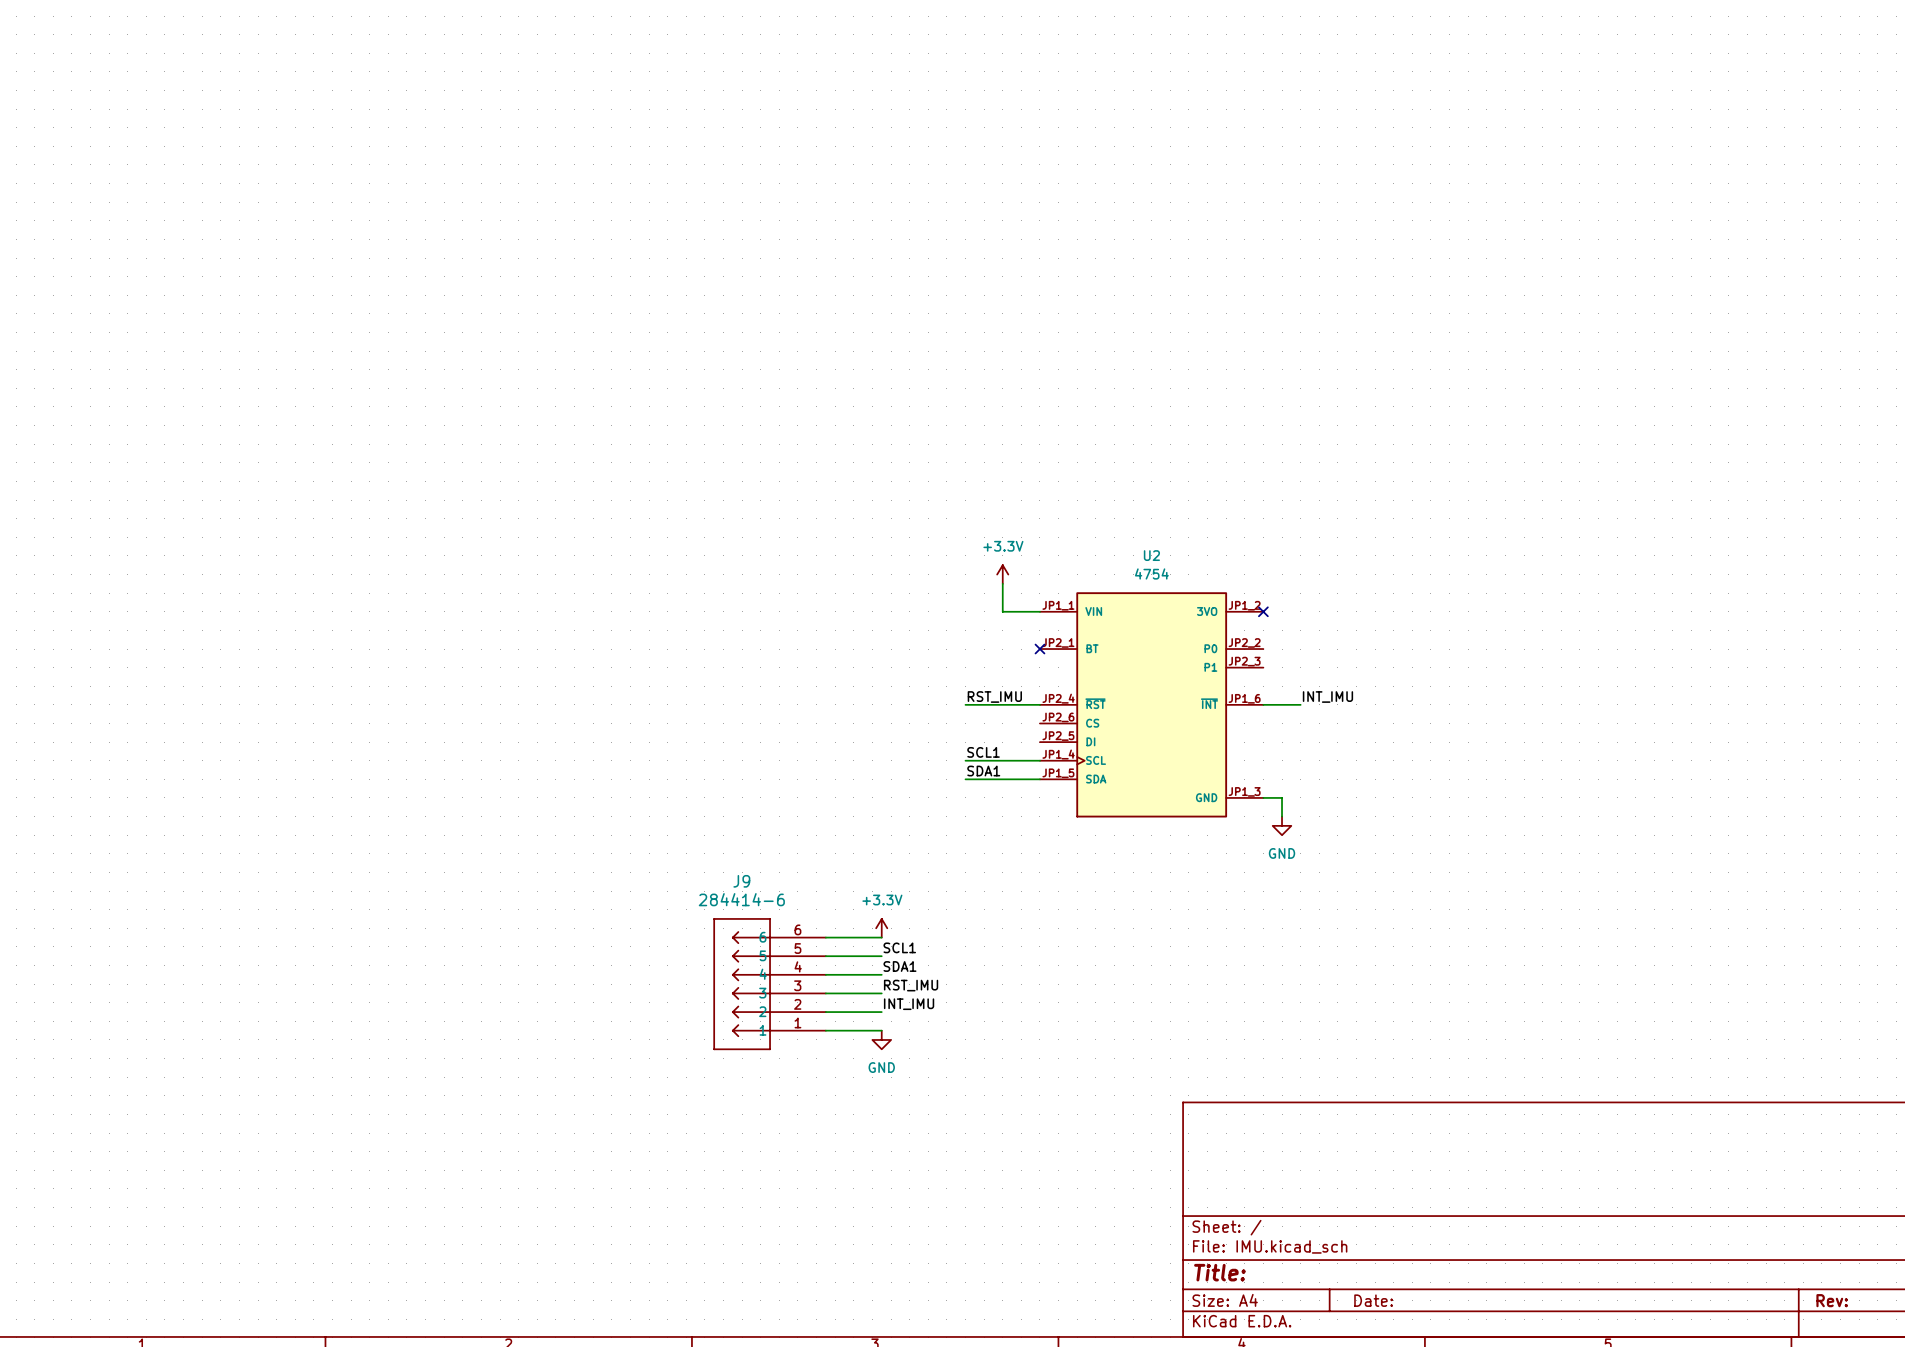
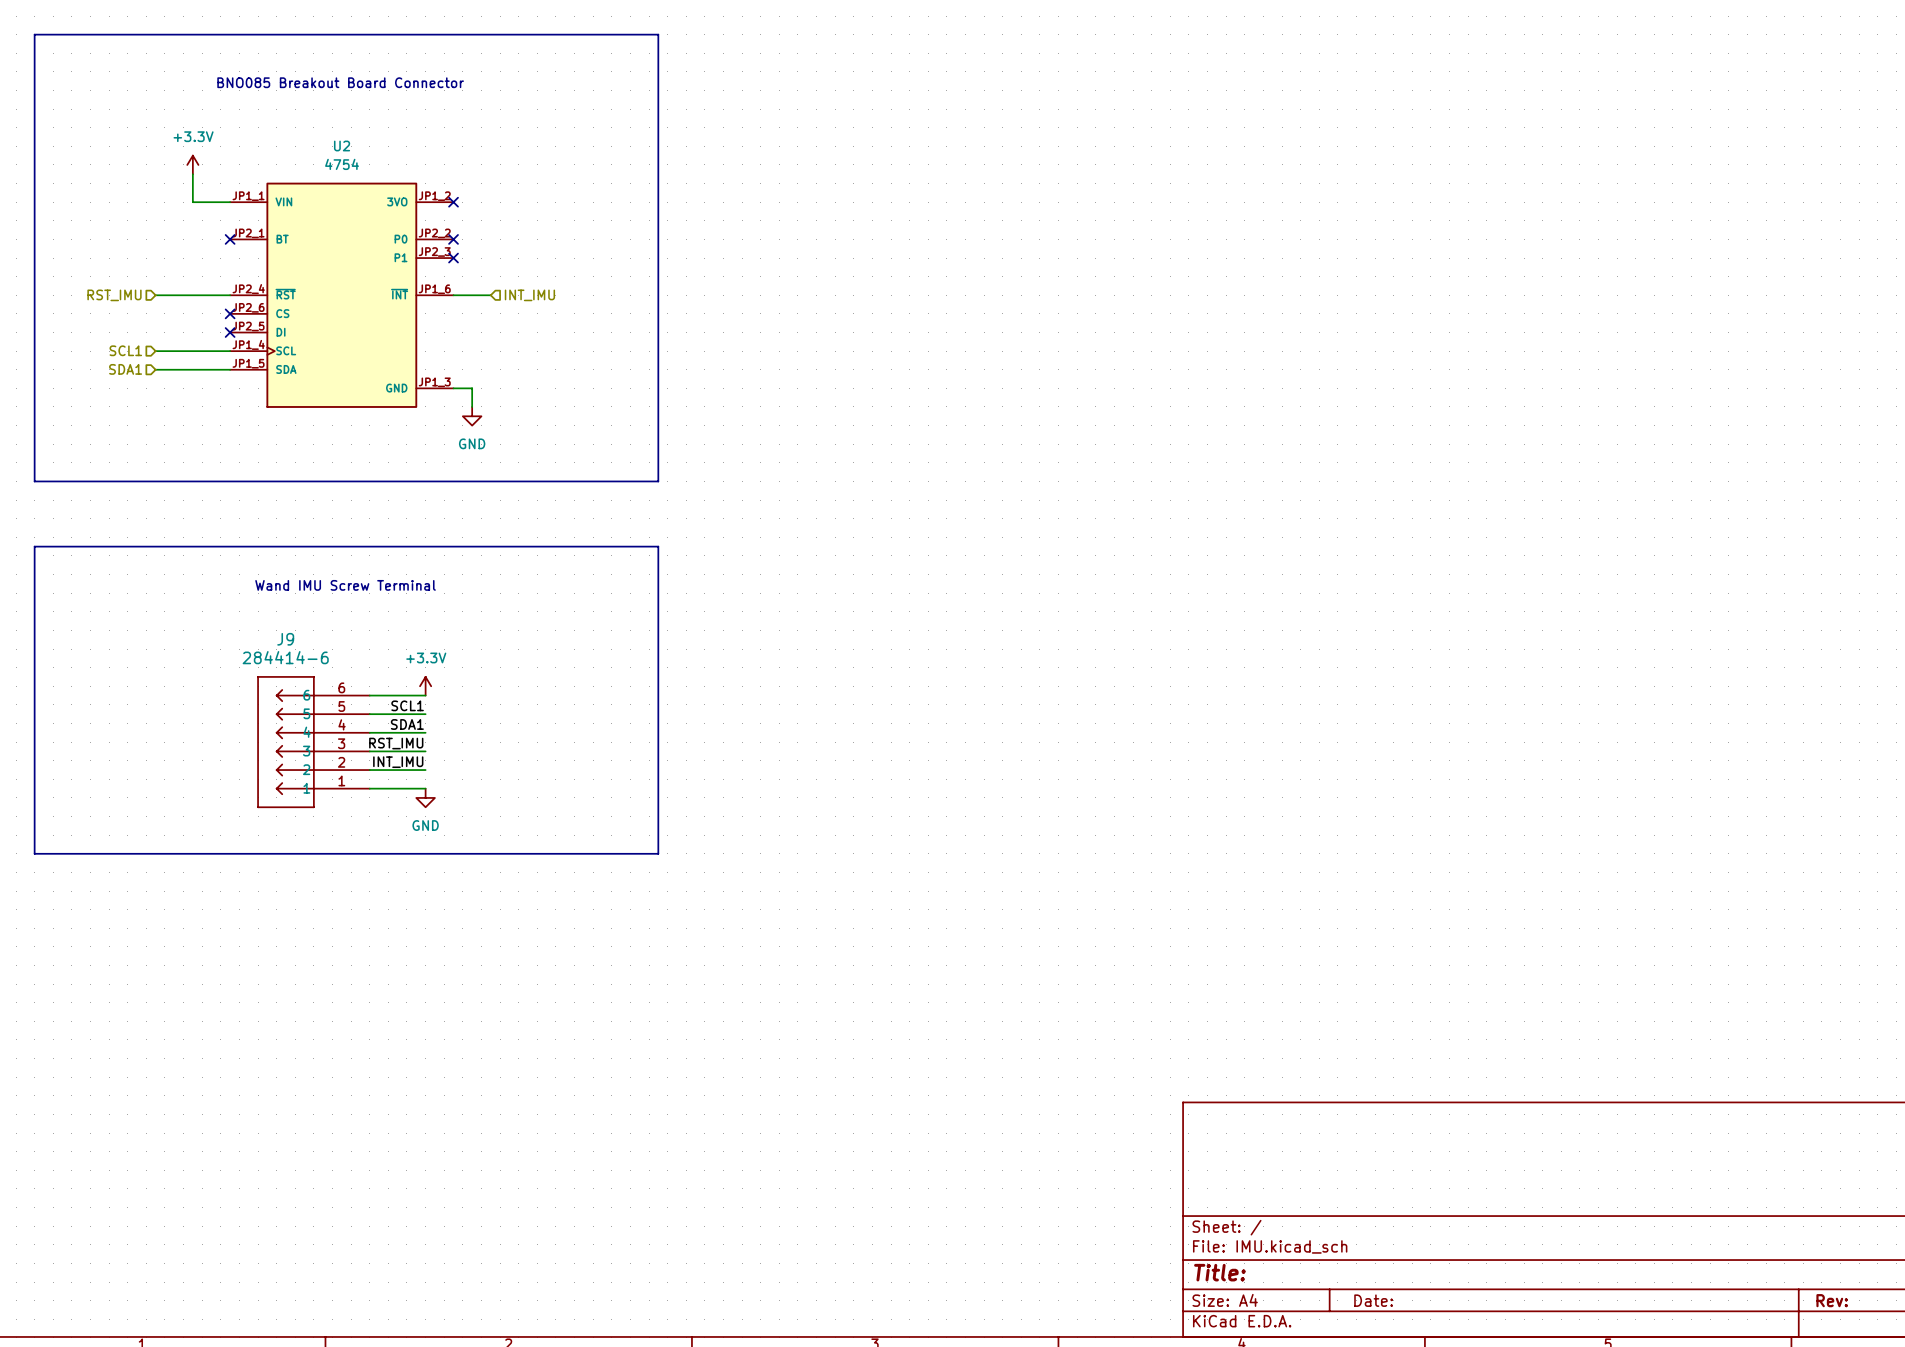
line: none -> (34, 34) (34, 481) (658, 481) (658, 34) (34, 34)
text: none -> BNO085 Breakout Board Connector (340, 82)
power symbol: none -> +3.3V (192, 164)
wire: none -> (192, 174) (192, 202) (230, 202)
no-connect mark: none -> (453, 202)
no-connect mark: none -> (230, 239)
no-connect mark: none -> (453, 239)
no-connect mark: none -> (453, 258)
hierarchical label: none -> RST_IMU (114, 295)
wire: none -> (155, 295) (230, 295)
wire: none -> (453, 295) (490, 295)
hierarchical label: none -> INT_IMU (529, 295)
no-connect mark: none -> (230, 313)
no-connect mark: none -> (230, 332)
hierarchical label: none -> SCL1 (125, 350)
wire: none -> (155, 351) (230, 351)
hierarchical label: none -> SDA1 (125, 369)
wire: none -> (155, 369) (230, 369)
wire: none -> (453, 388) (472, 388) (472, 406)
power symbol: none -> GND (472, 416)
line: none -> (34, 546) (658, 546) (658, 853) (34, 853) (34, 546)
power symbol: +3.3V (1002, 574) -> none
wire: (1002, 583) (1002, 611) (1039, 611) -> none
text: none -> Wand IMU Screw Terminal (345, 585)
no-connect mark: (1263, 611) -> none
no-connect mark: (1039, 649) -> none
power symbol: none -> +3.3V (425, 686)
wire: none -> (369, 695) (425, 695)
label: RST_IMU (994, 697) -> none
label: INT_IMU (1327, 697) -> none
wire: (965, 704) (1039, 704) -> none
U2 position: (1151, 704) -> (341, 295)
wire: (1263, 704) (1300, 704) -> none
label: none -> SCL1 (407, 705)
wire: none -> (369, 714) (425, 714)
label: none -> SDA1 (407, 724)
wire: none -> (369, 732) (425, 732)
label: none -> RST_IMU (396, 743)
wire: none -> (369, 751) (425, 751)
label: SCL1 (983, 752) -> none
wire: (965, 760) (1039, 760) -> none
label: none -> INT_IMU (398, 762)
wire: none -> (369, 770) (425, 770)
label: SDA1 (983, 771) -> none
wire: (965, 779) (1039, 779) -> none
wire: none -> (369, 788) (425, 788)
power symbol: none -> GND (425, 797)
wire: (1263, 797) (1282, 797) (1282, 816) -> none
power symbol: GND (1282, 825) -> none
power symbol: +3.3V (881, 928) -> none
wire: (825, 937) (881, 937) -> none
label: SCL1 (899, 947) -> none
wire: (825, 956) (881, 956) -> none
label: SDA1 (899, 966) -> none
wire: (825, 974) (881, 974) -> none
J9 position: (769, 984) -> (313, 742)
label: RST_IMU (911, 985) -> none
wire: (825, 993) (881, 993) -> none
label: INT_IMU (909, 1004) -> none
wire: (825, 1012) (881, 1012) -> none
wire: (825, 1030) (881, 1030) -> none
power symbol: GND (881, 1039) -> none

